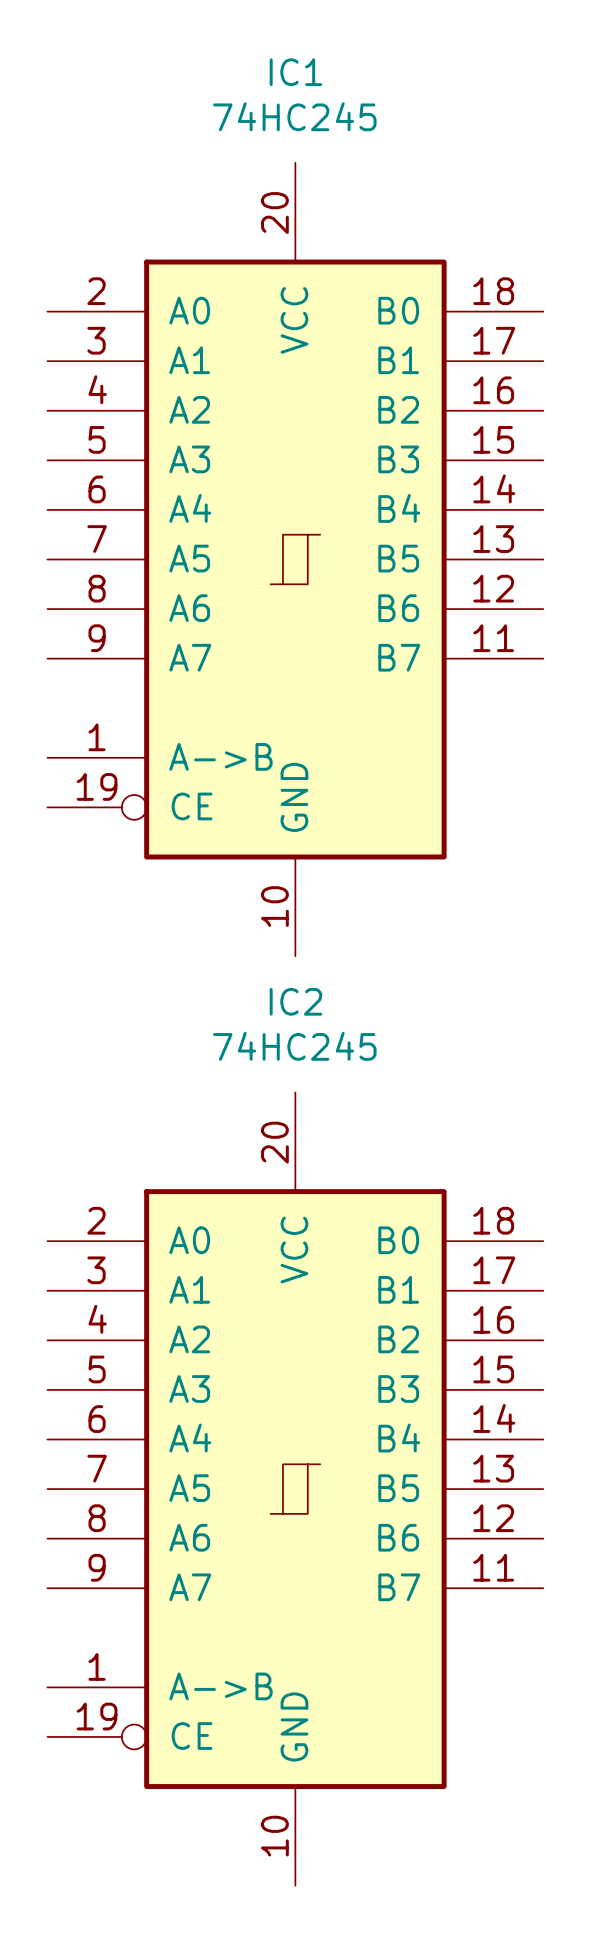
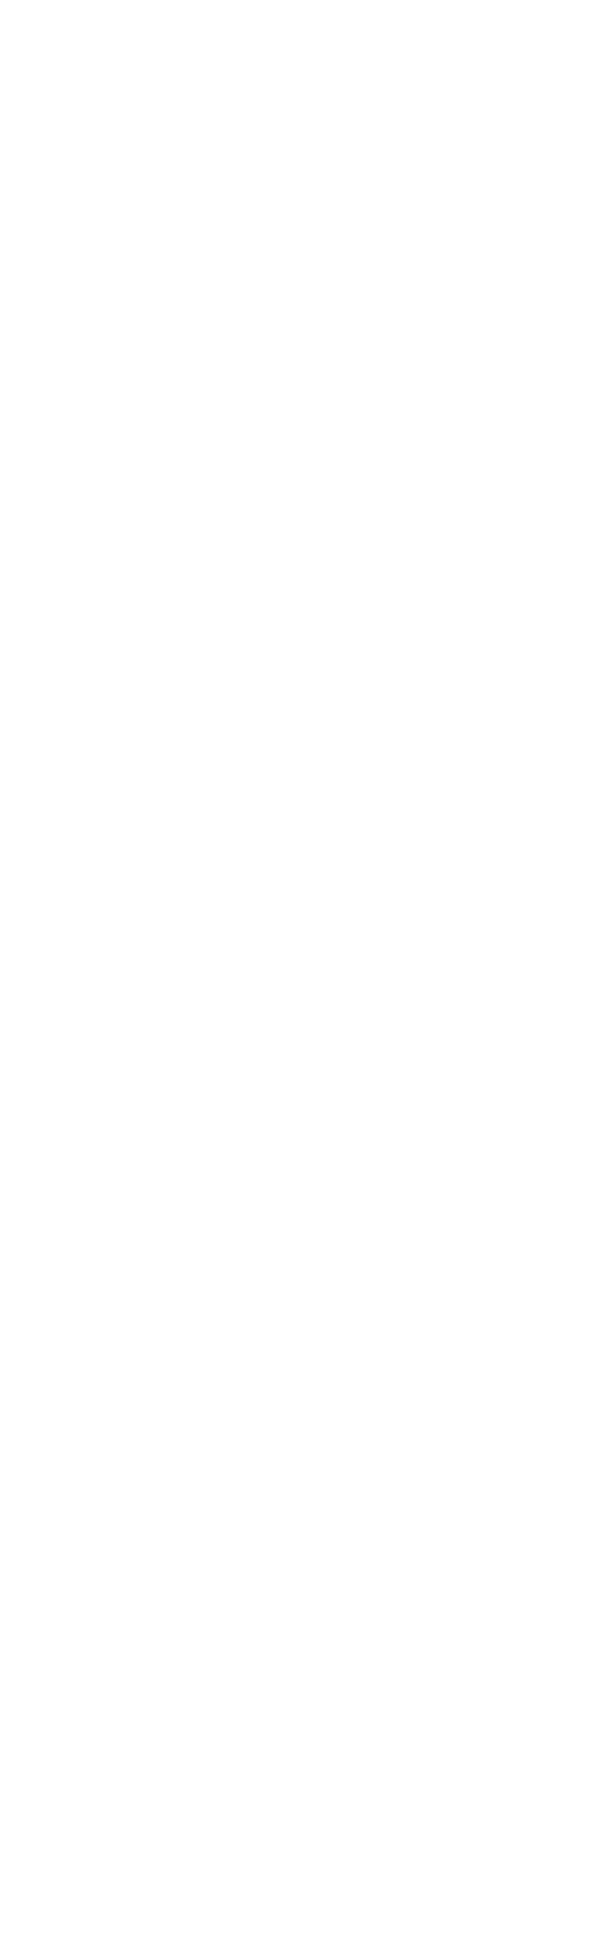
IC1: 74HC245 (295, 559) -> none
IC2: 74HC245 (295, 1489) -> none

